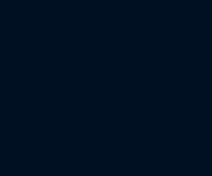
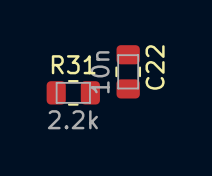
C22: none -> 10n (128, 71)
R31: none -> 2.2k (73, 92)

